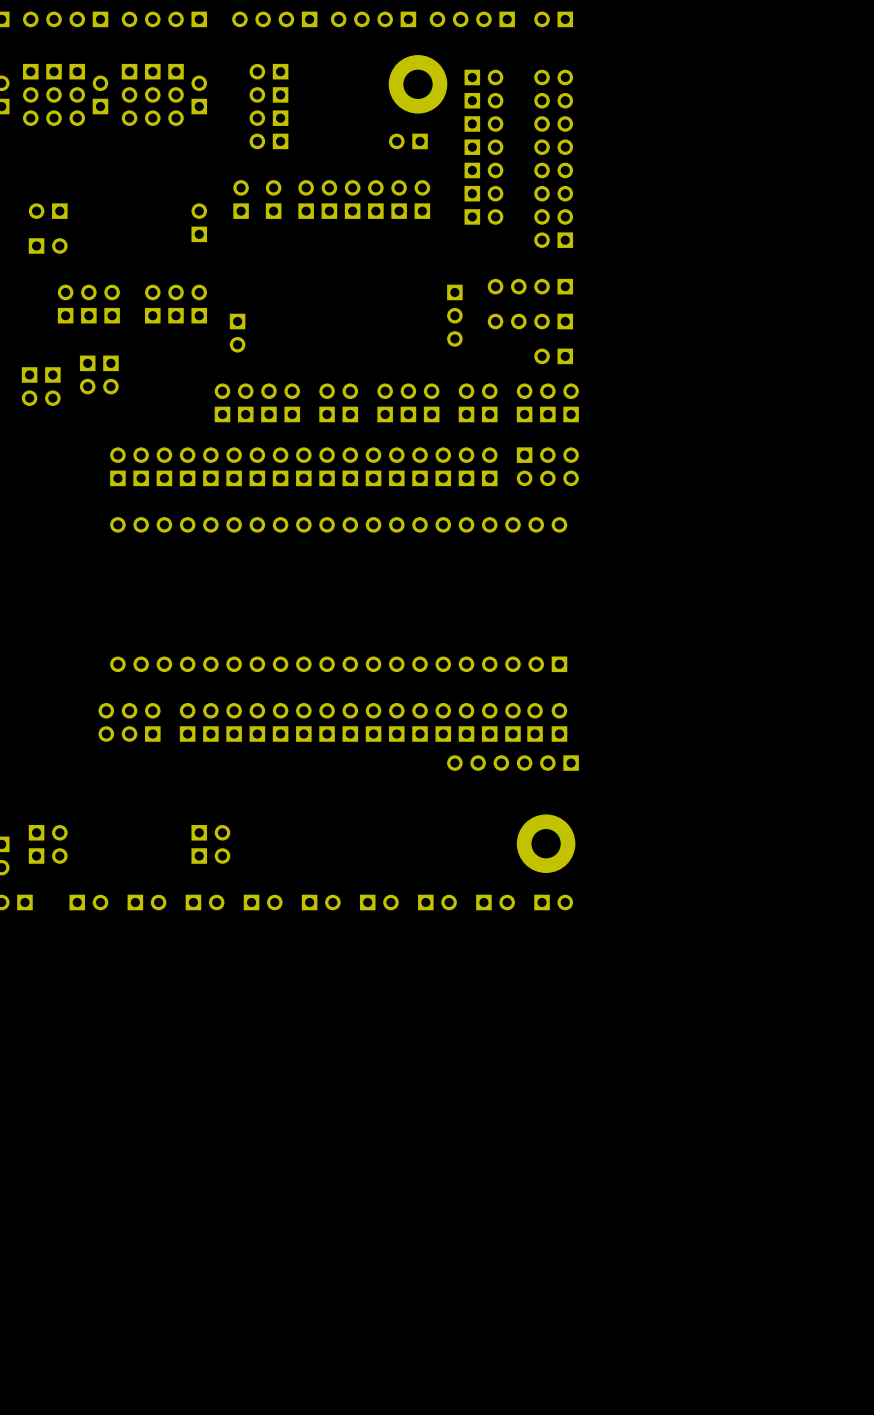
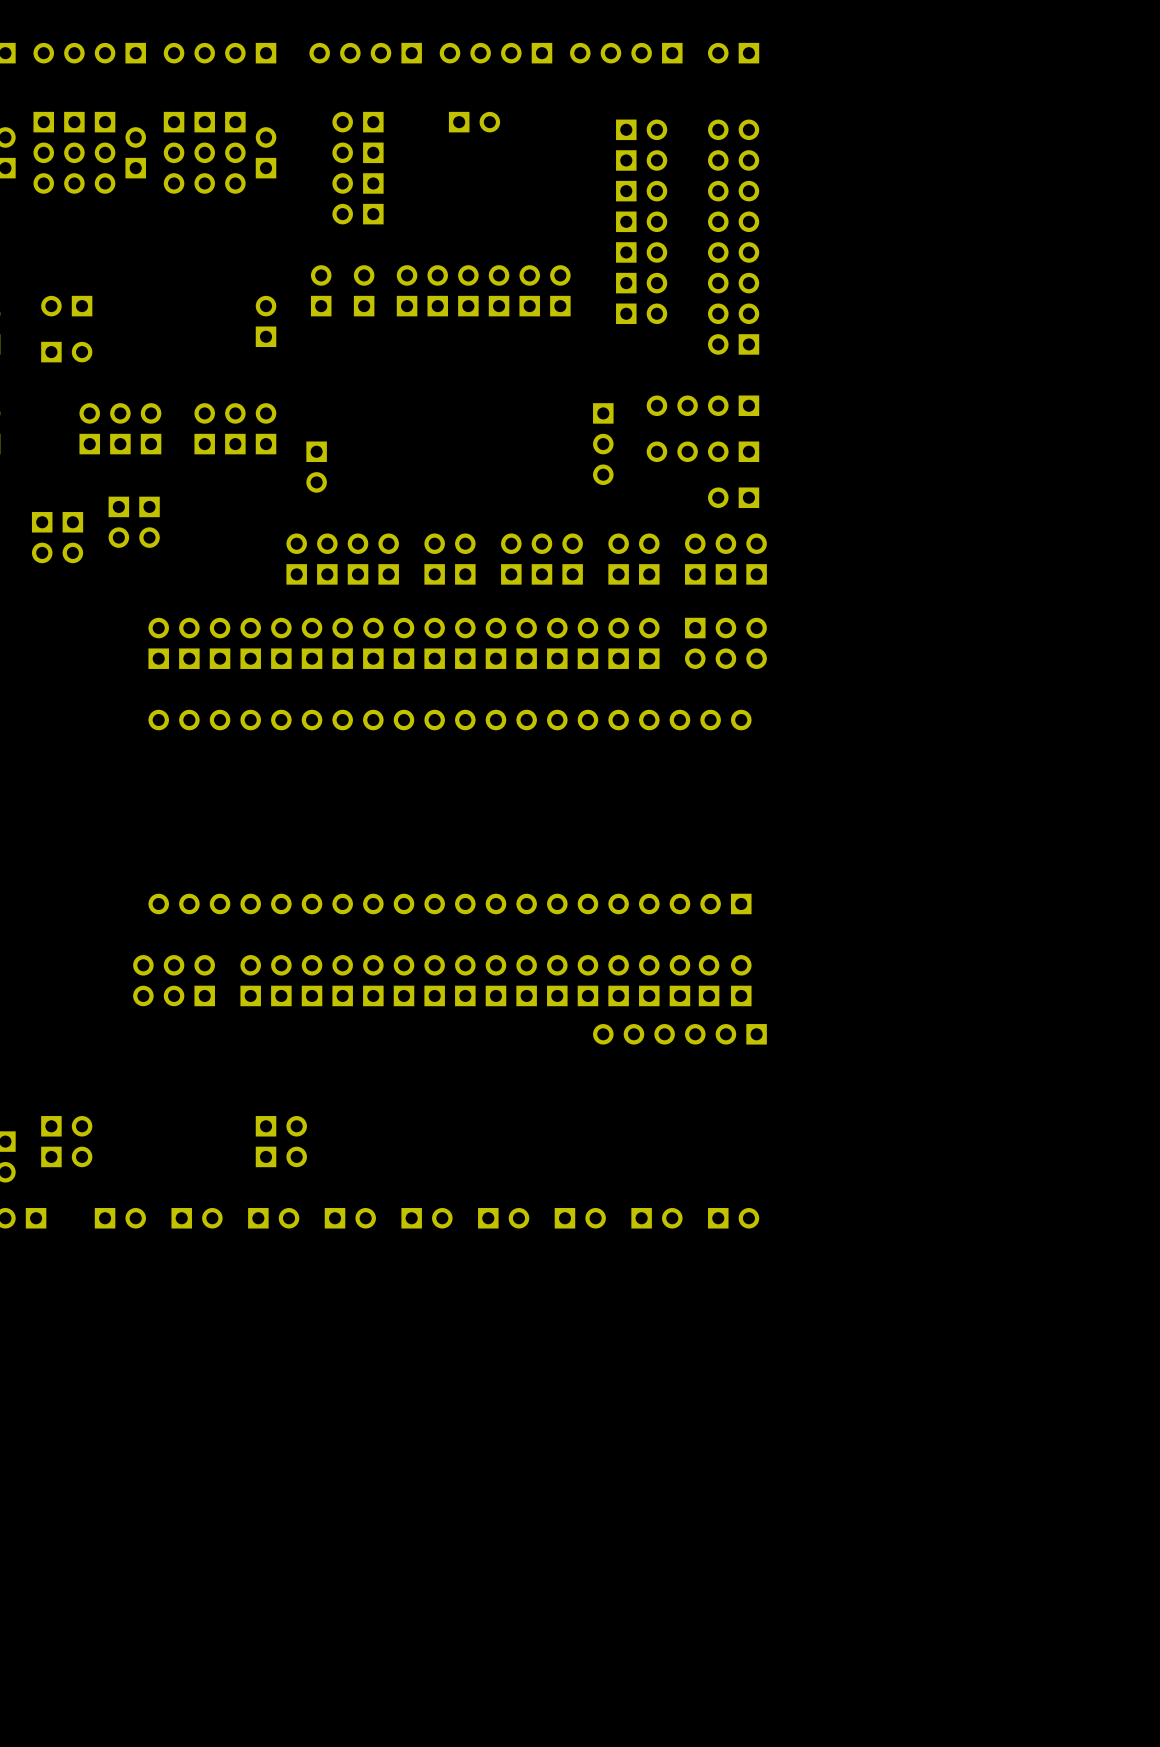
part: (418, 84) -> none
part rotation: 0° (408, 141) -> 180° (474, 122)
part position: (408, 141) -> (474, 122)
part: (546, 843) -> none

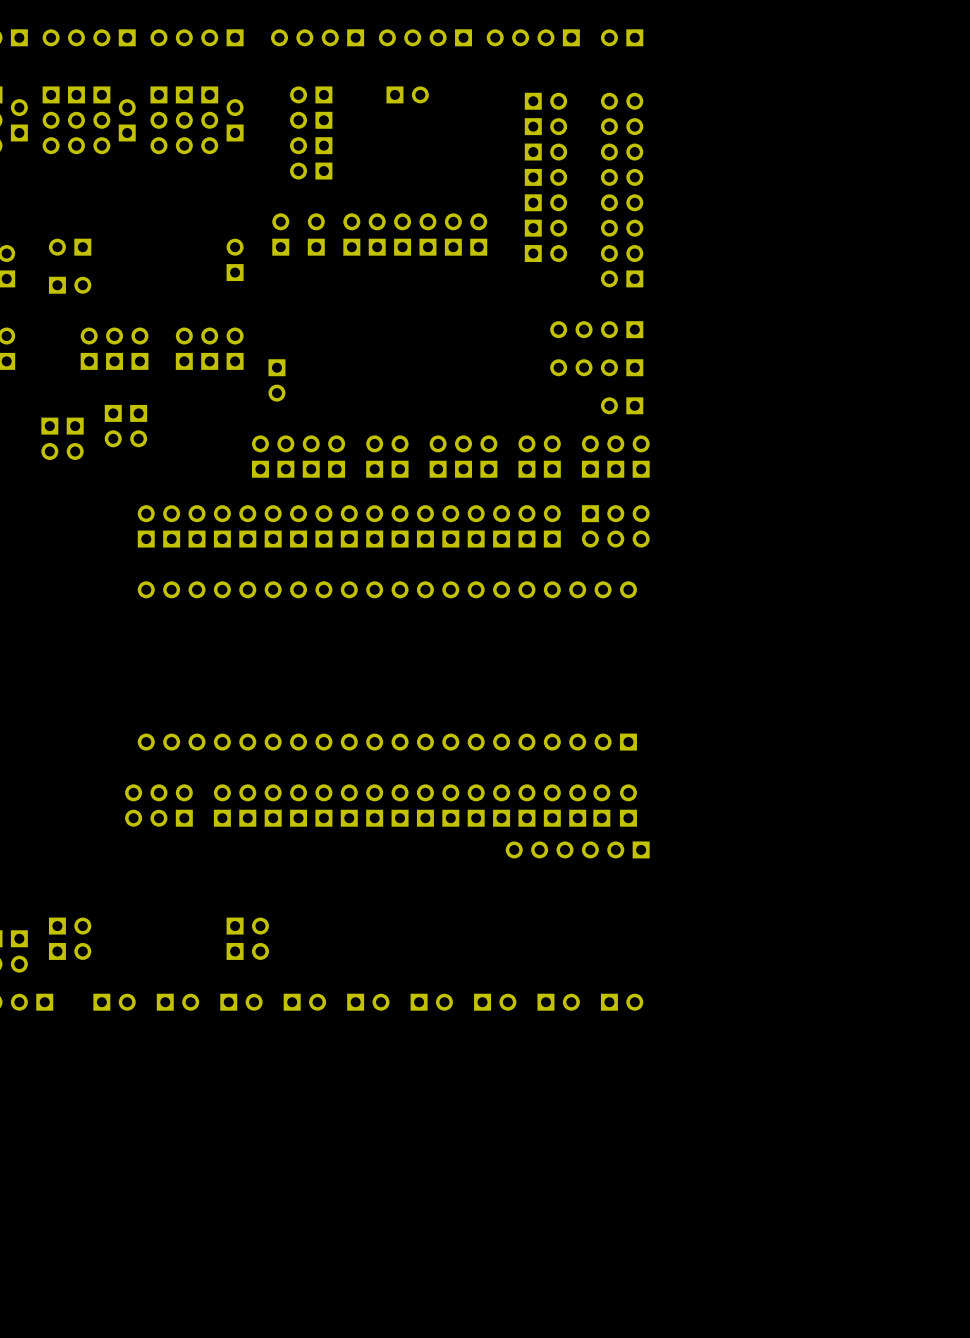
part: (603, 444) -> none

